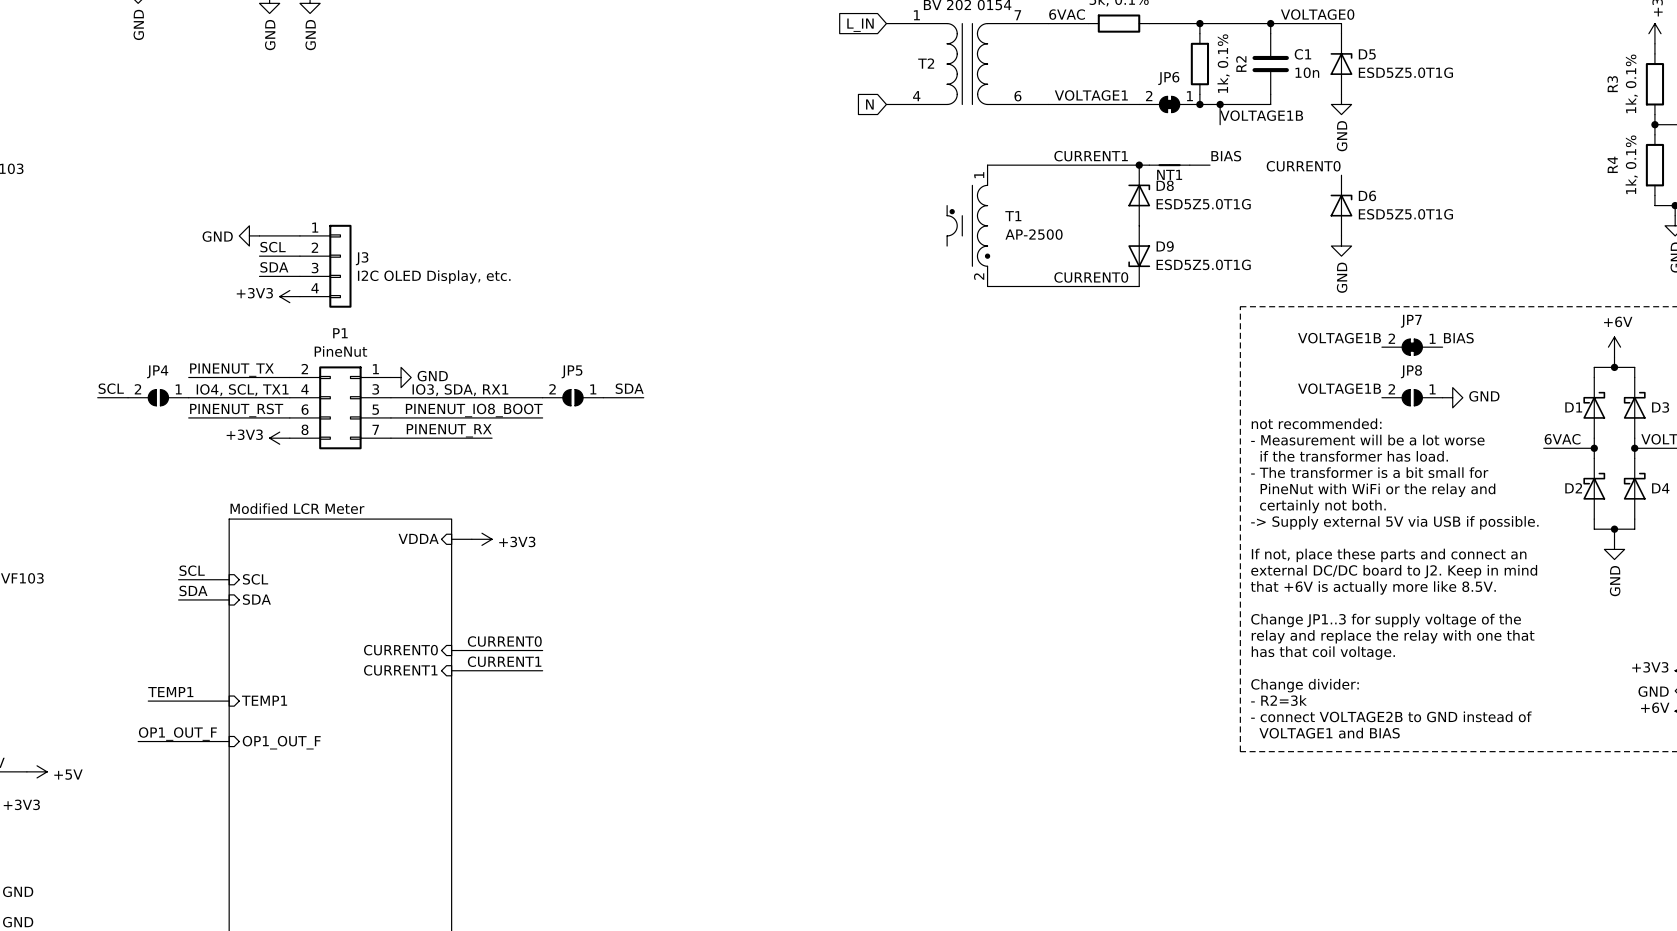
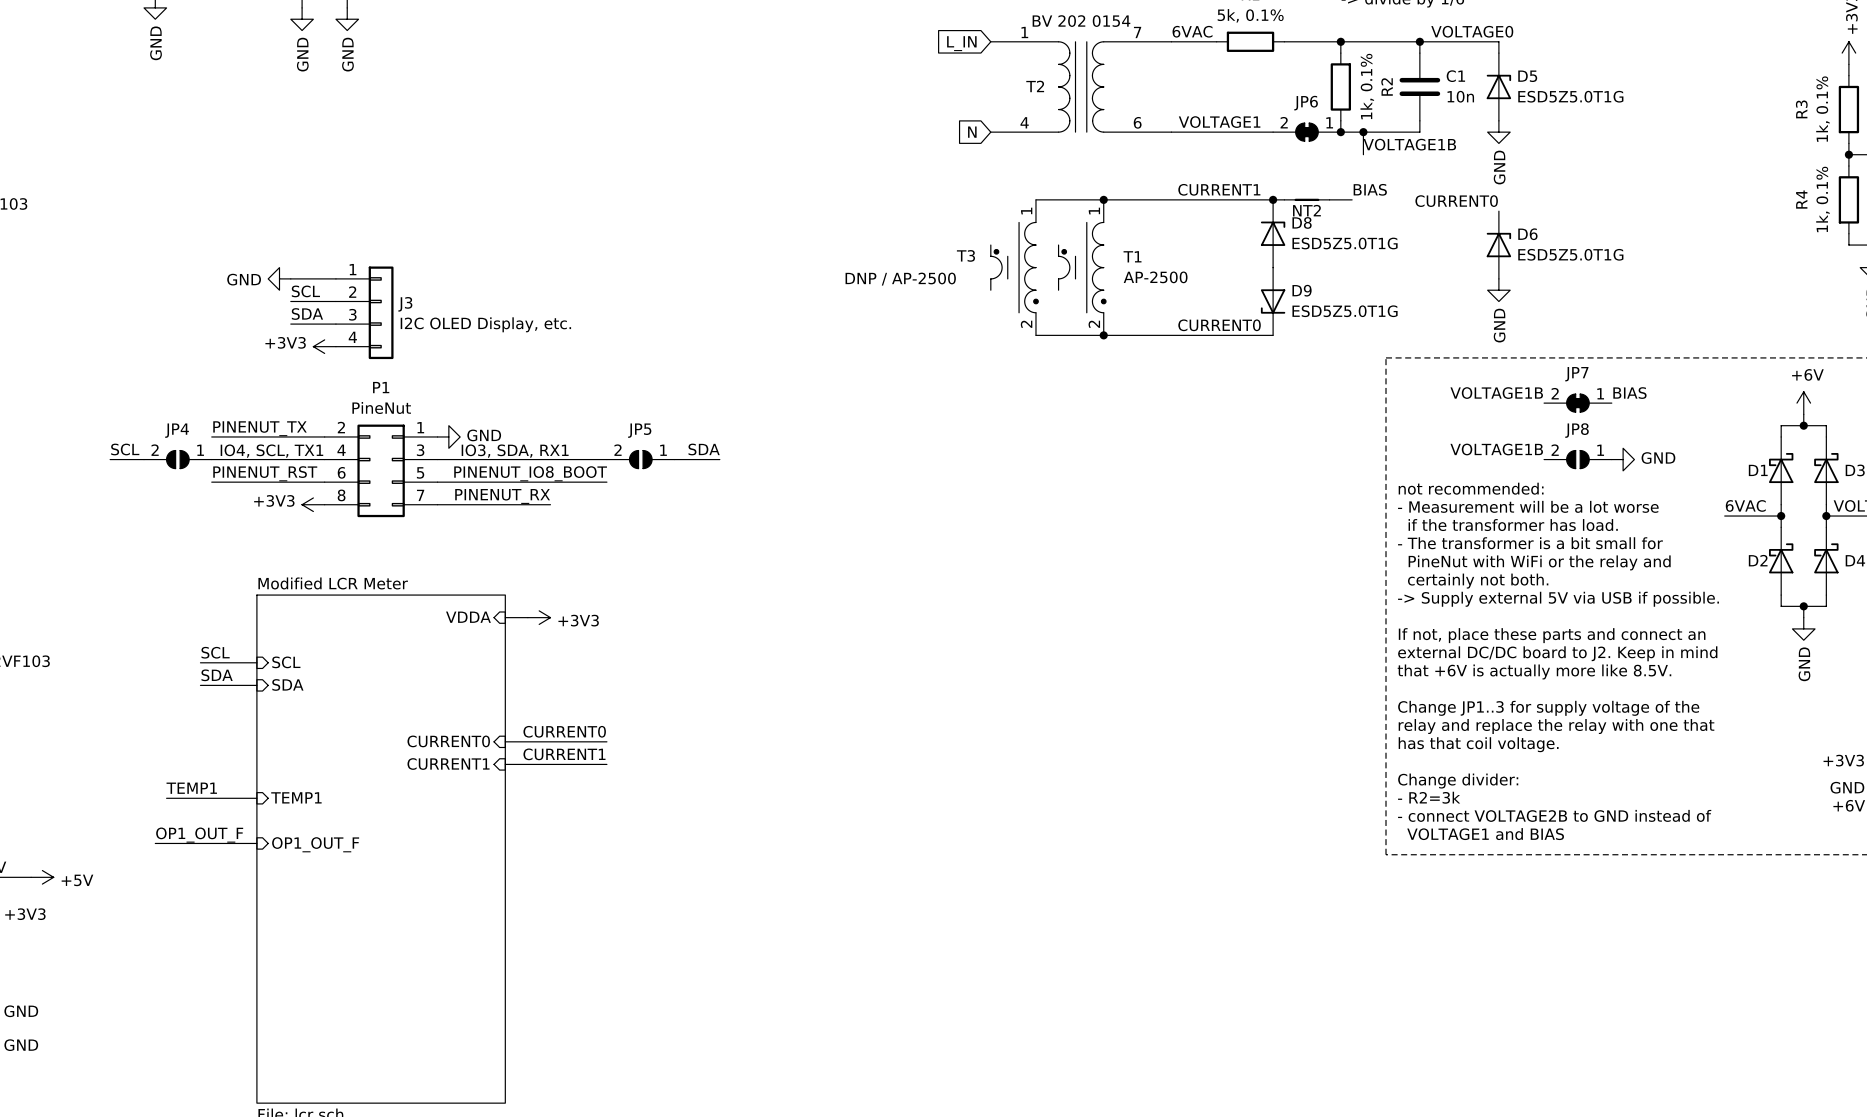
wire: none -> (1035, 199) (1103, 199)
junction: none -> (1103, 199)
NT1 name: NT1 (1169, 174) -> NT2 (1306, 210)
T3: none -> DNP / AP-2500 (1014, 267)
wire: none -> (1035, 335) (1103, 335)
junction: none -> (1103, 335)

